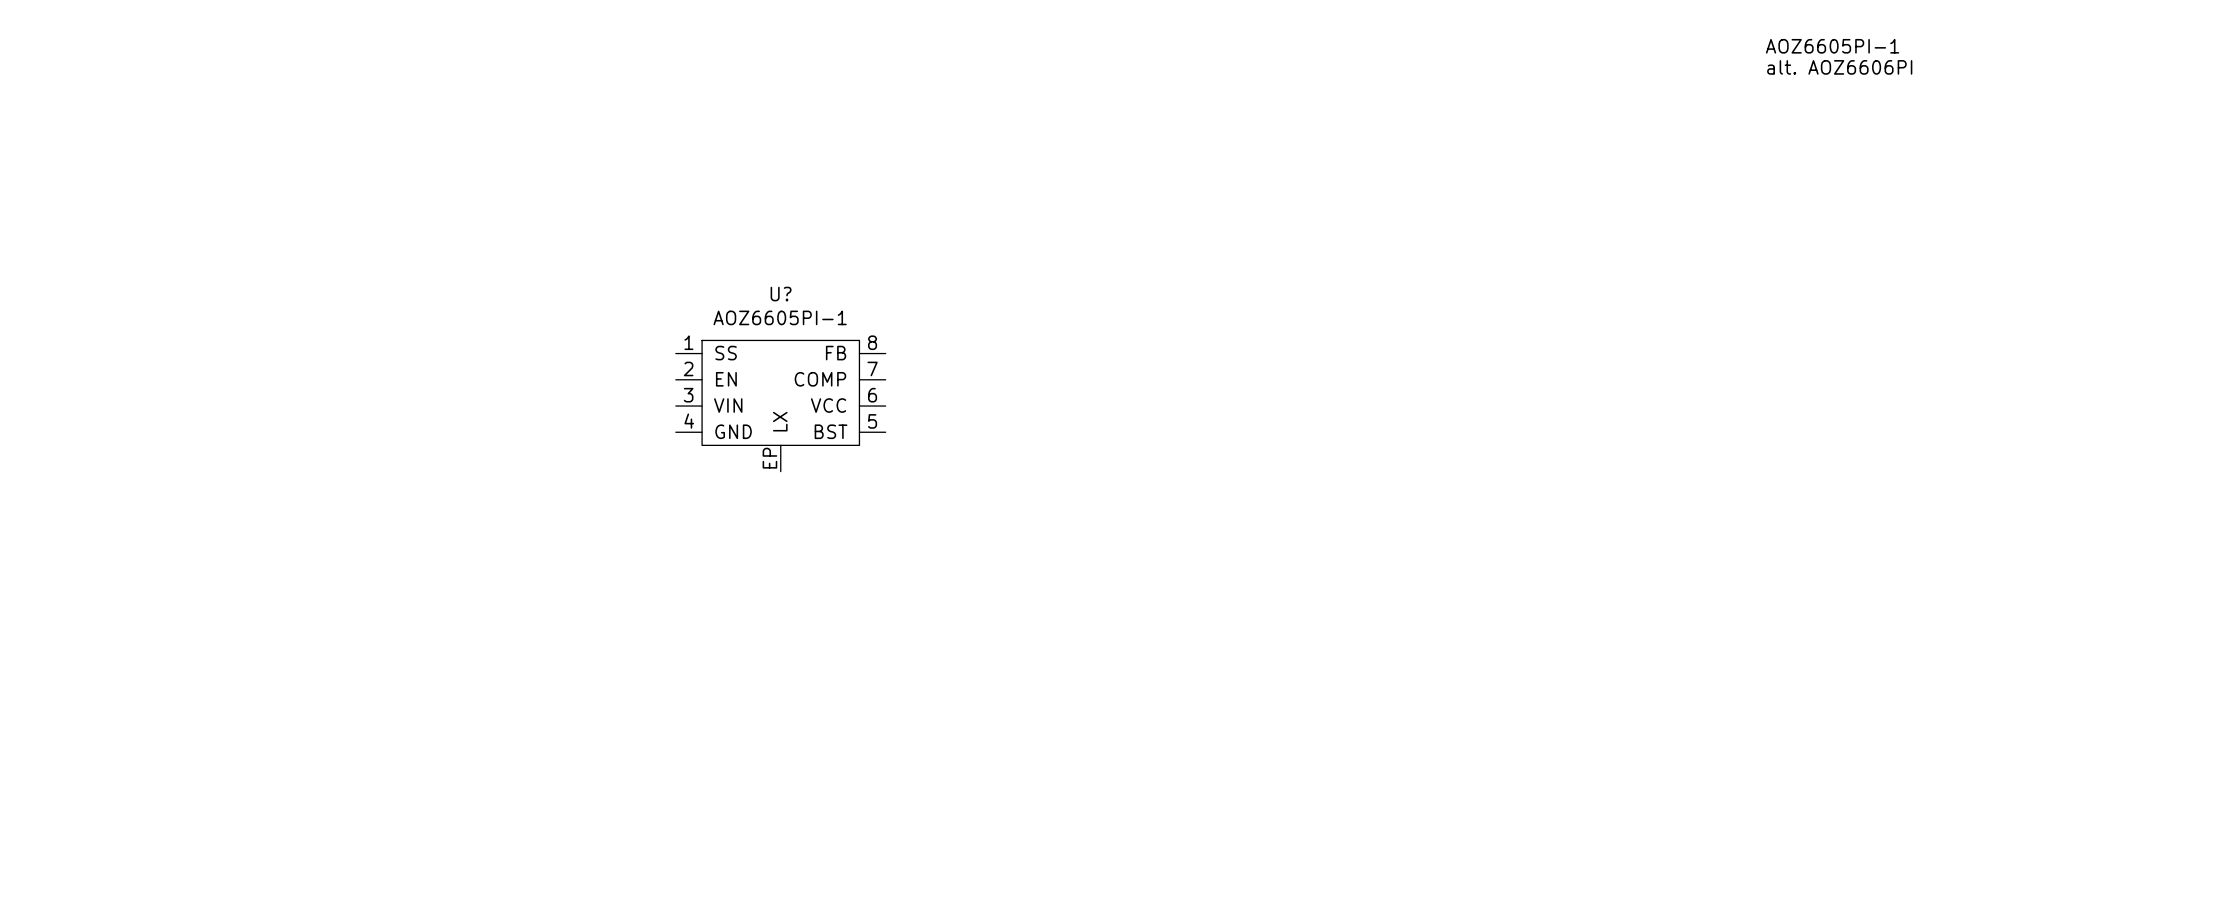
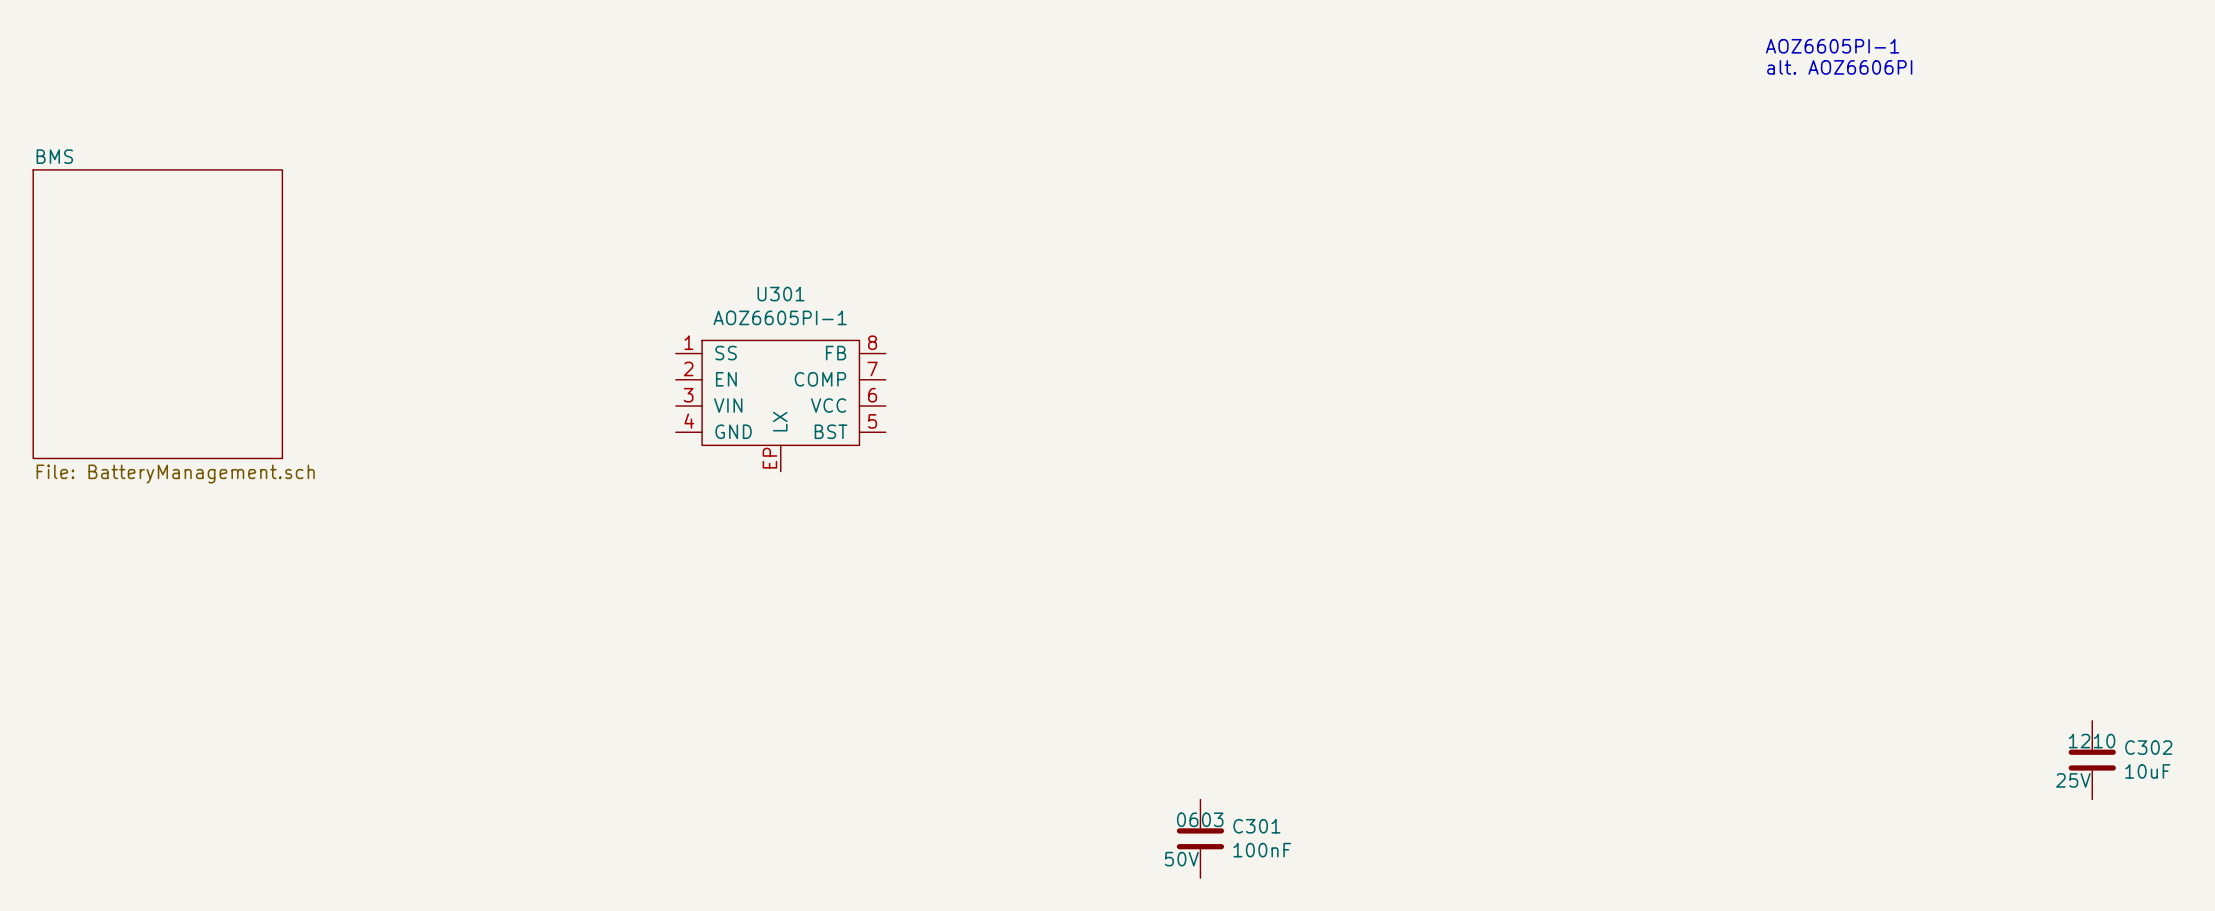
U? name: U? (781, 294) -> U301 (781, 294)
sheet BMS: none -> File: BatteryManagement.sch (157, 314)
C302: none -> 10uF (2092, 760)
C301: none -> 100nF (1200, 838)

